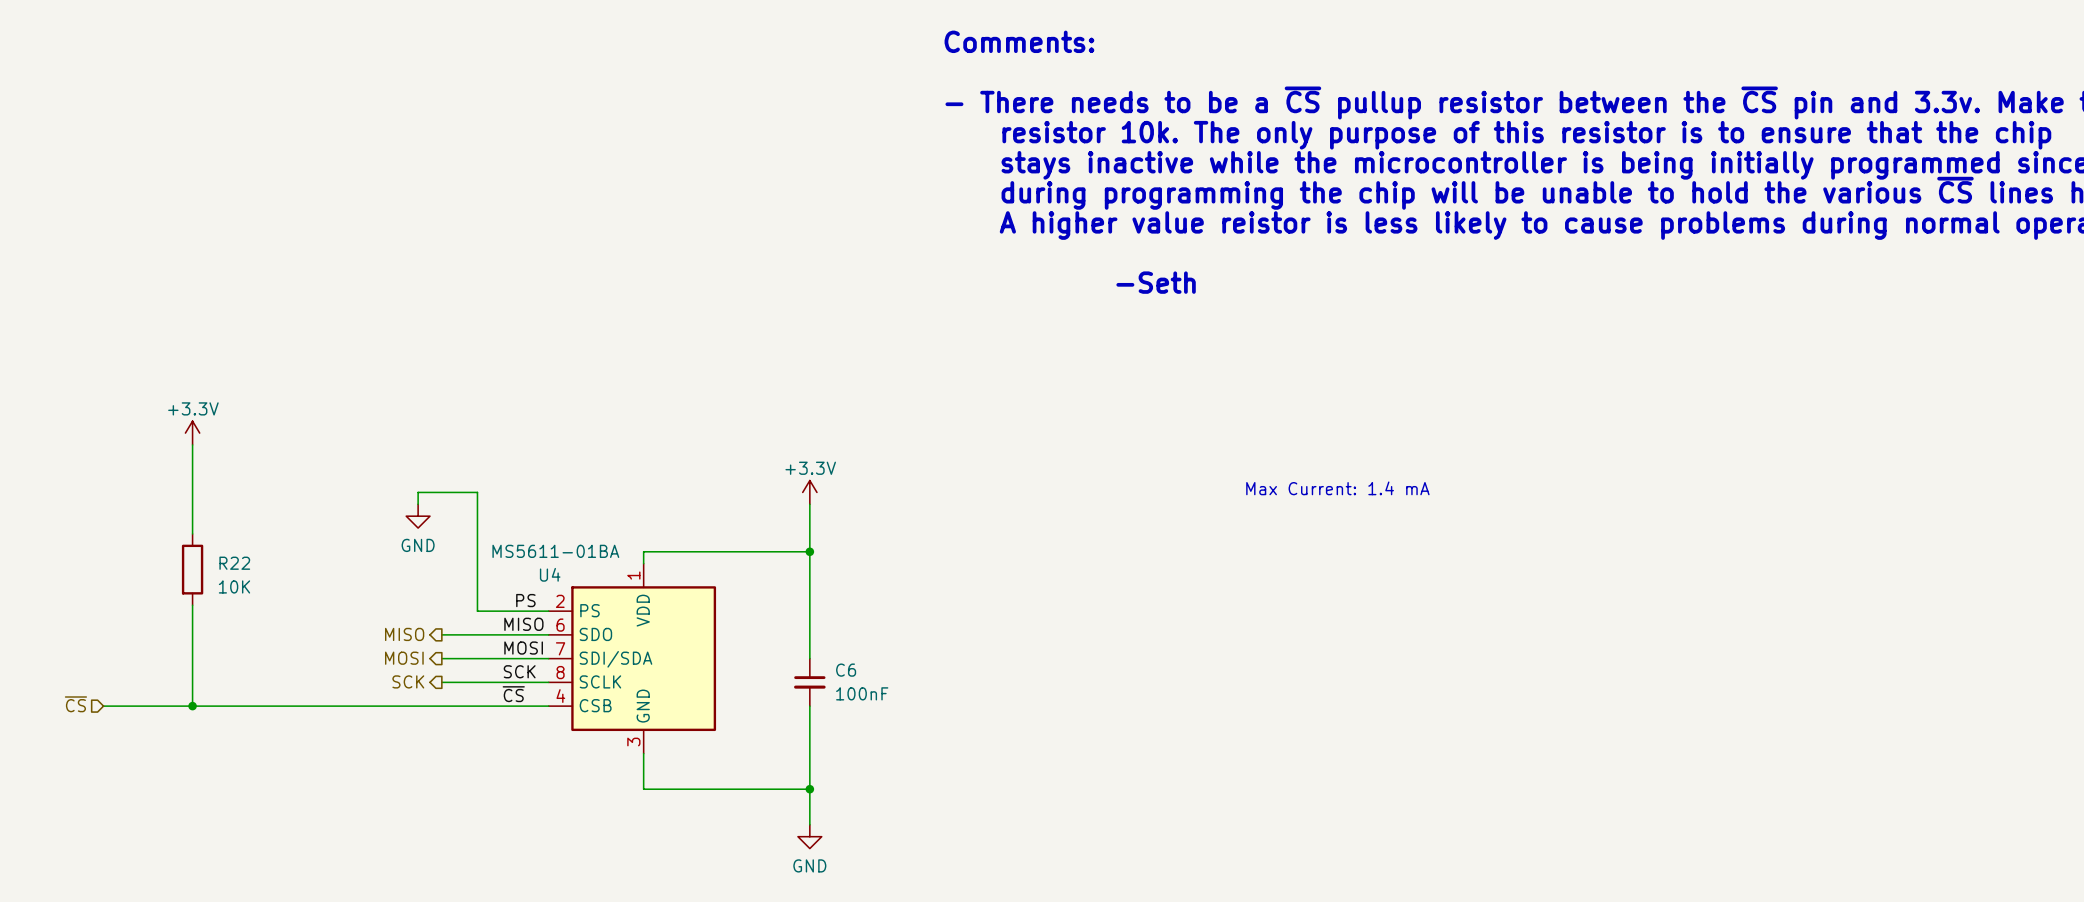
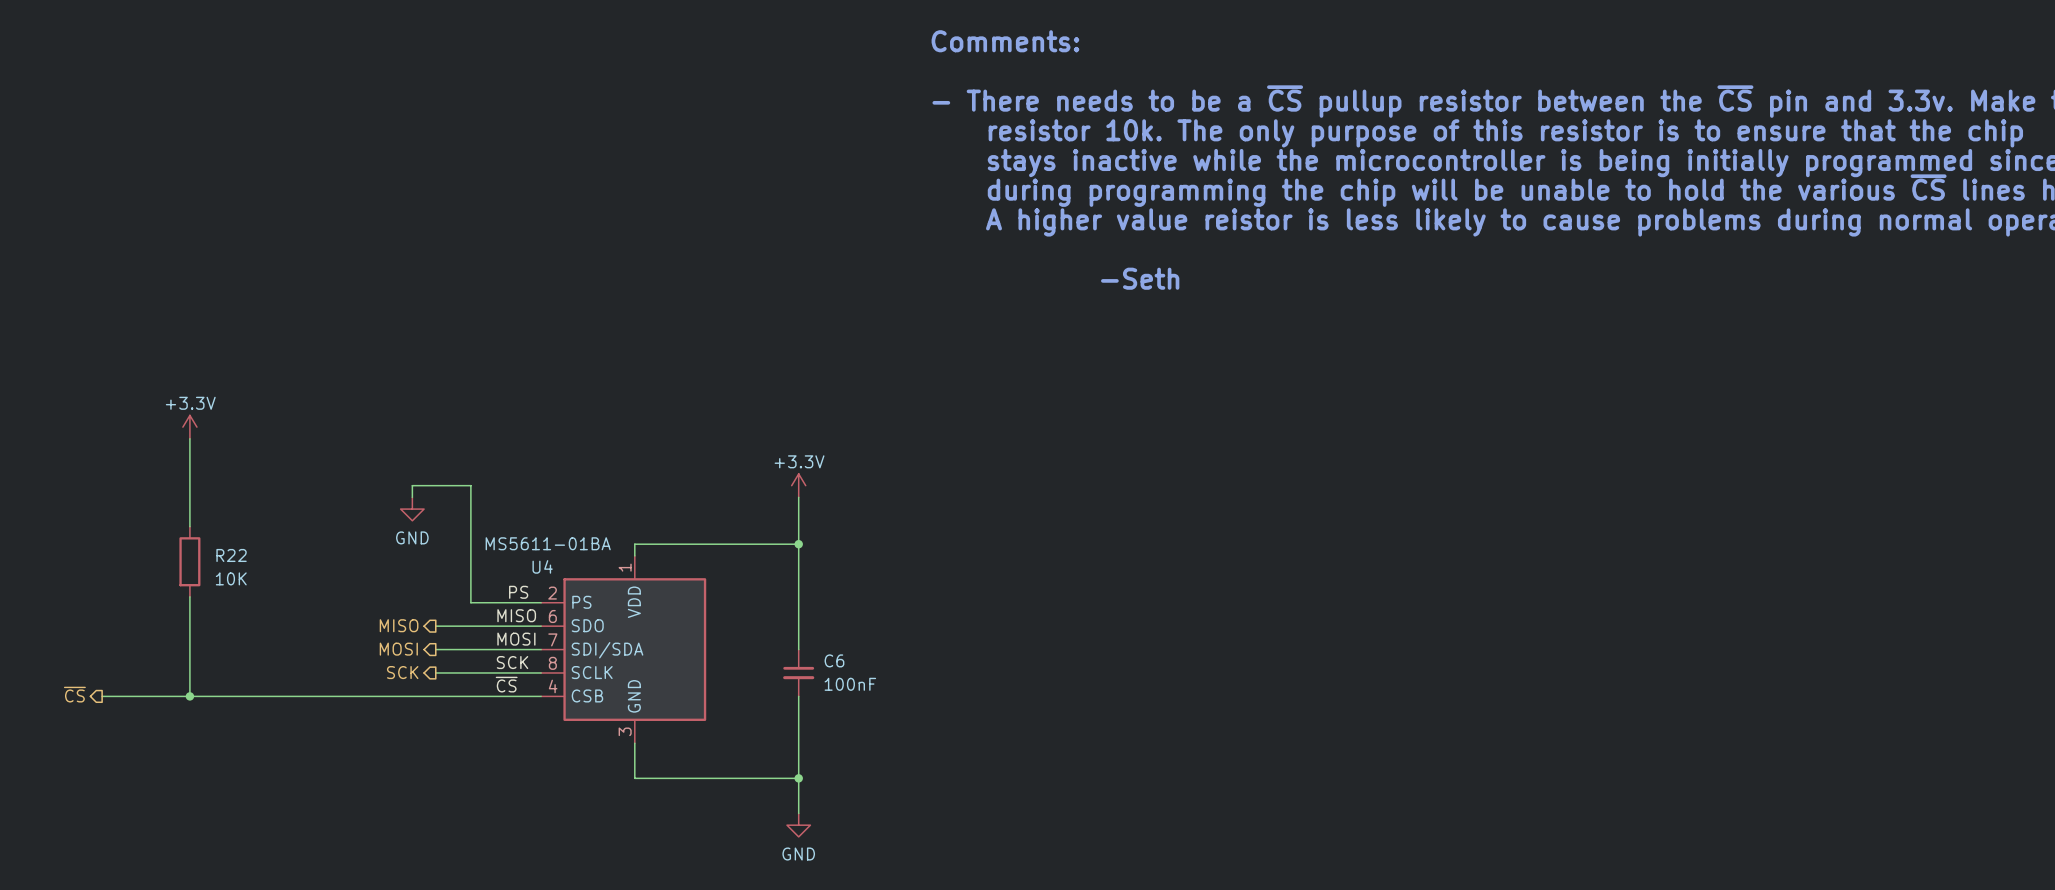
text: Max Current: 1.4 mA (1337, 488) -> none
hierarchical label shape: input (75, 704) -> output (74, 694)

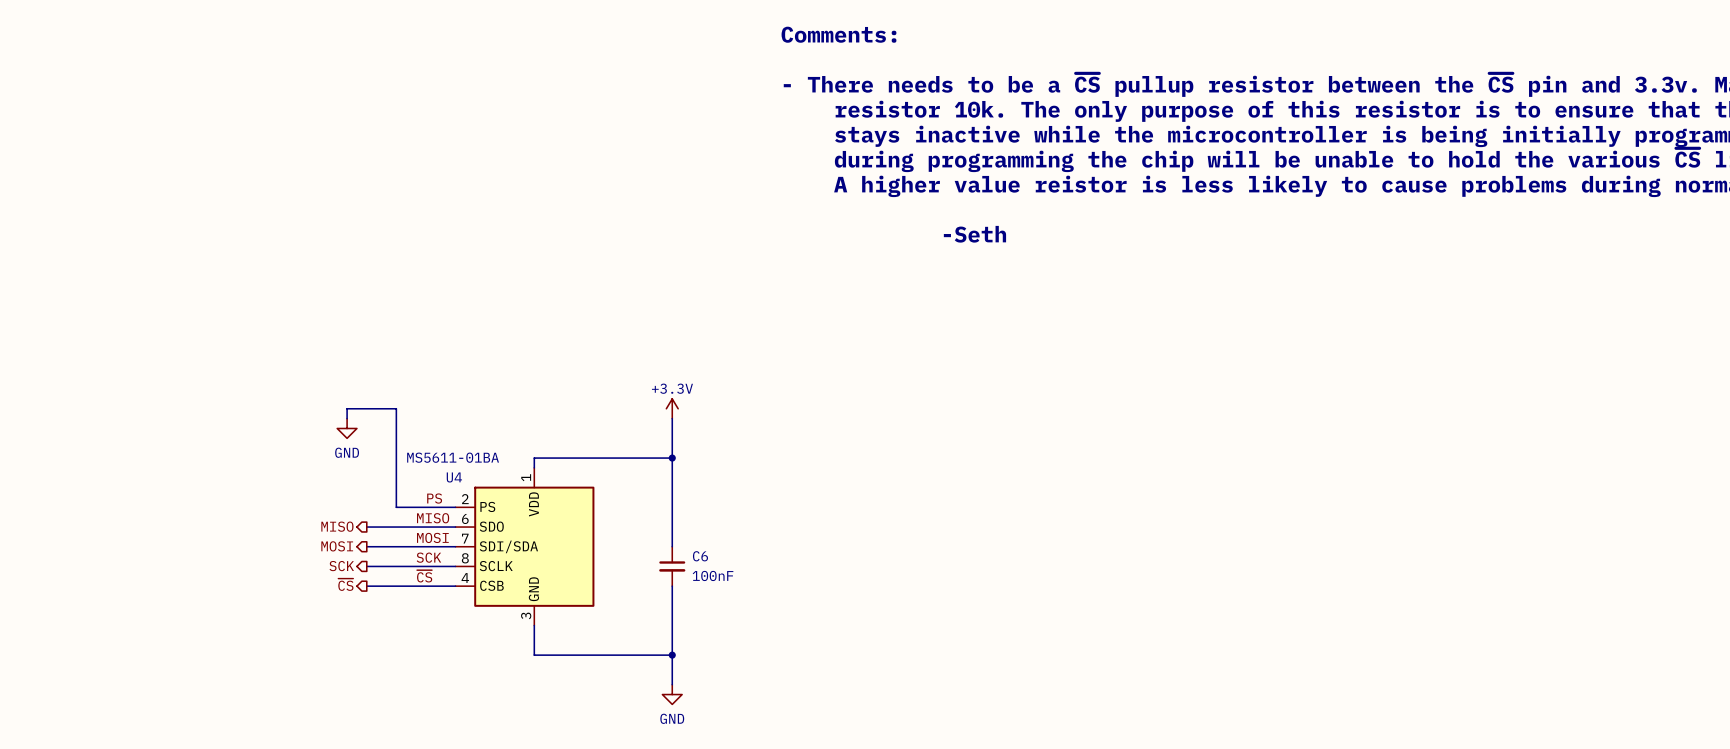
power symbol: +3.3V (189, 427) -> none
wire: (189, 438) (189, 526) -> none
R22: 10K (189, 561) -> none
wire: (189, 596) (189, 696) -> none
hierarchical label: ~{CS} (74, 694) -> none
hierarchical label: none -> ~{CS} (345, 584)
wire: (102, 696) (435, 696) -> none
junction: (189, 696) -> none

